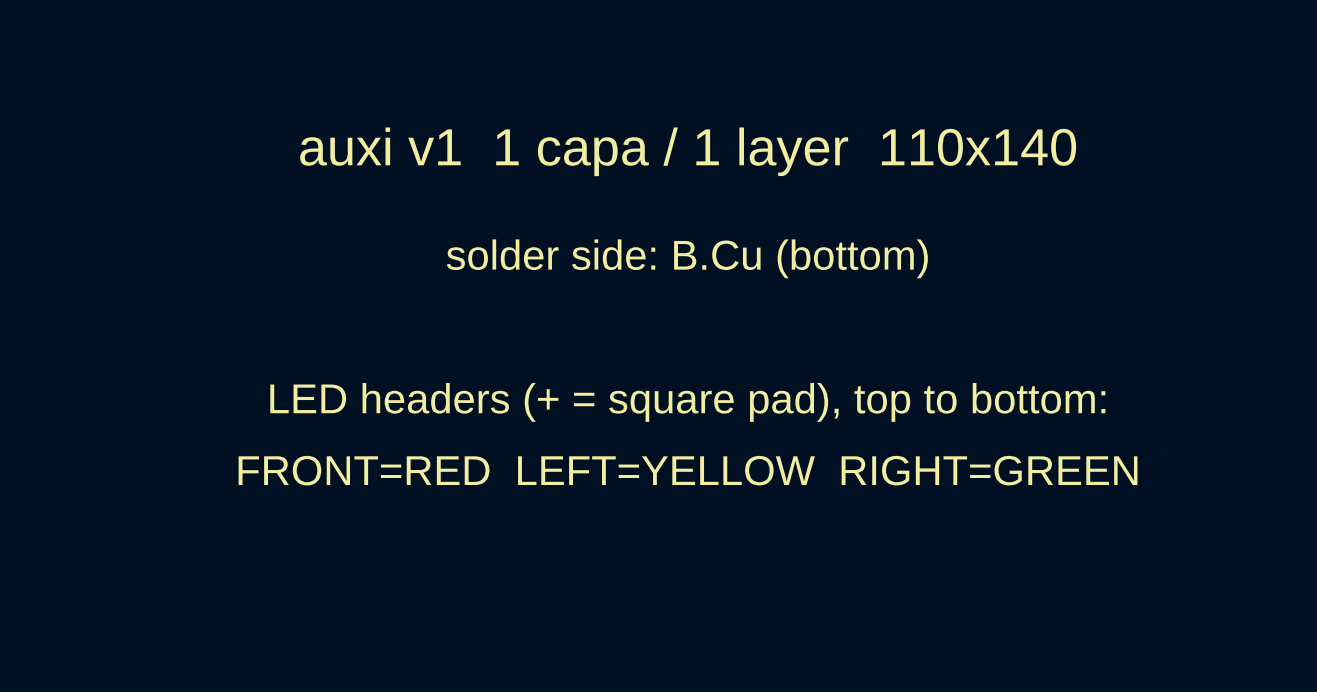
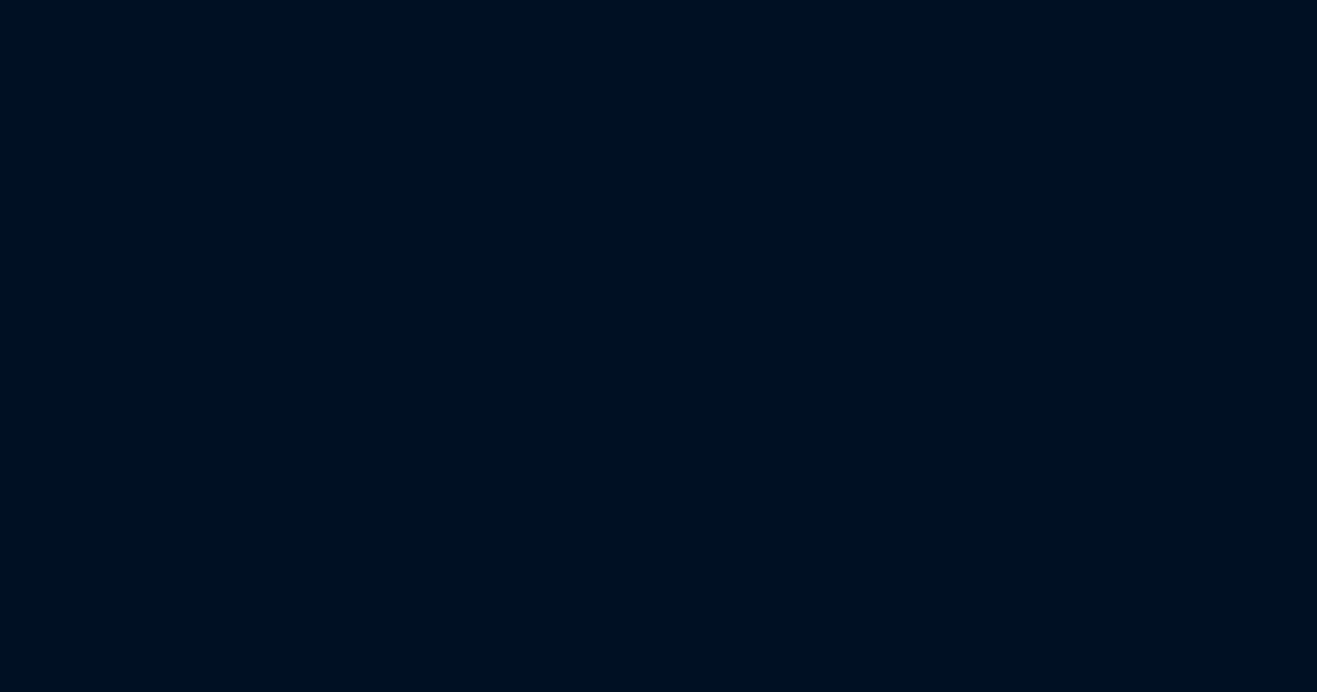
text: auxi v1 1 capa / 1 layer 110x140 (688, 151) -> none
text: solder side: B.Cu (bottom) (687, 258) -> none
text: LED headers (+ = square pad), top to bottom: (687, 402) -> none
text: FRONT=RED LEFT=YELLOW RIGHT=GREEN (688, 470) -> none

